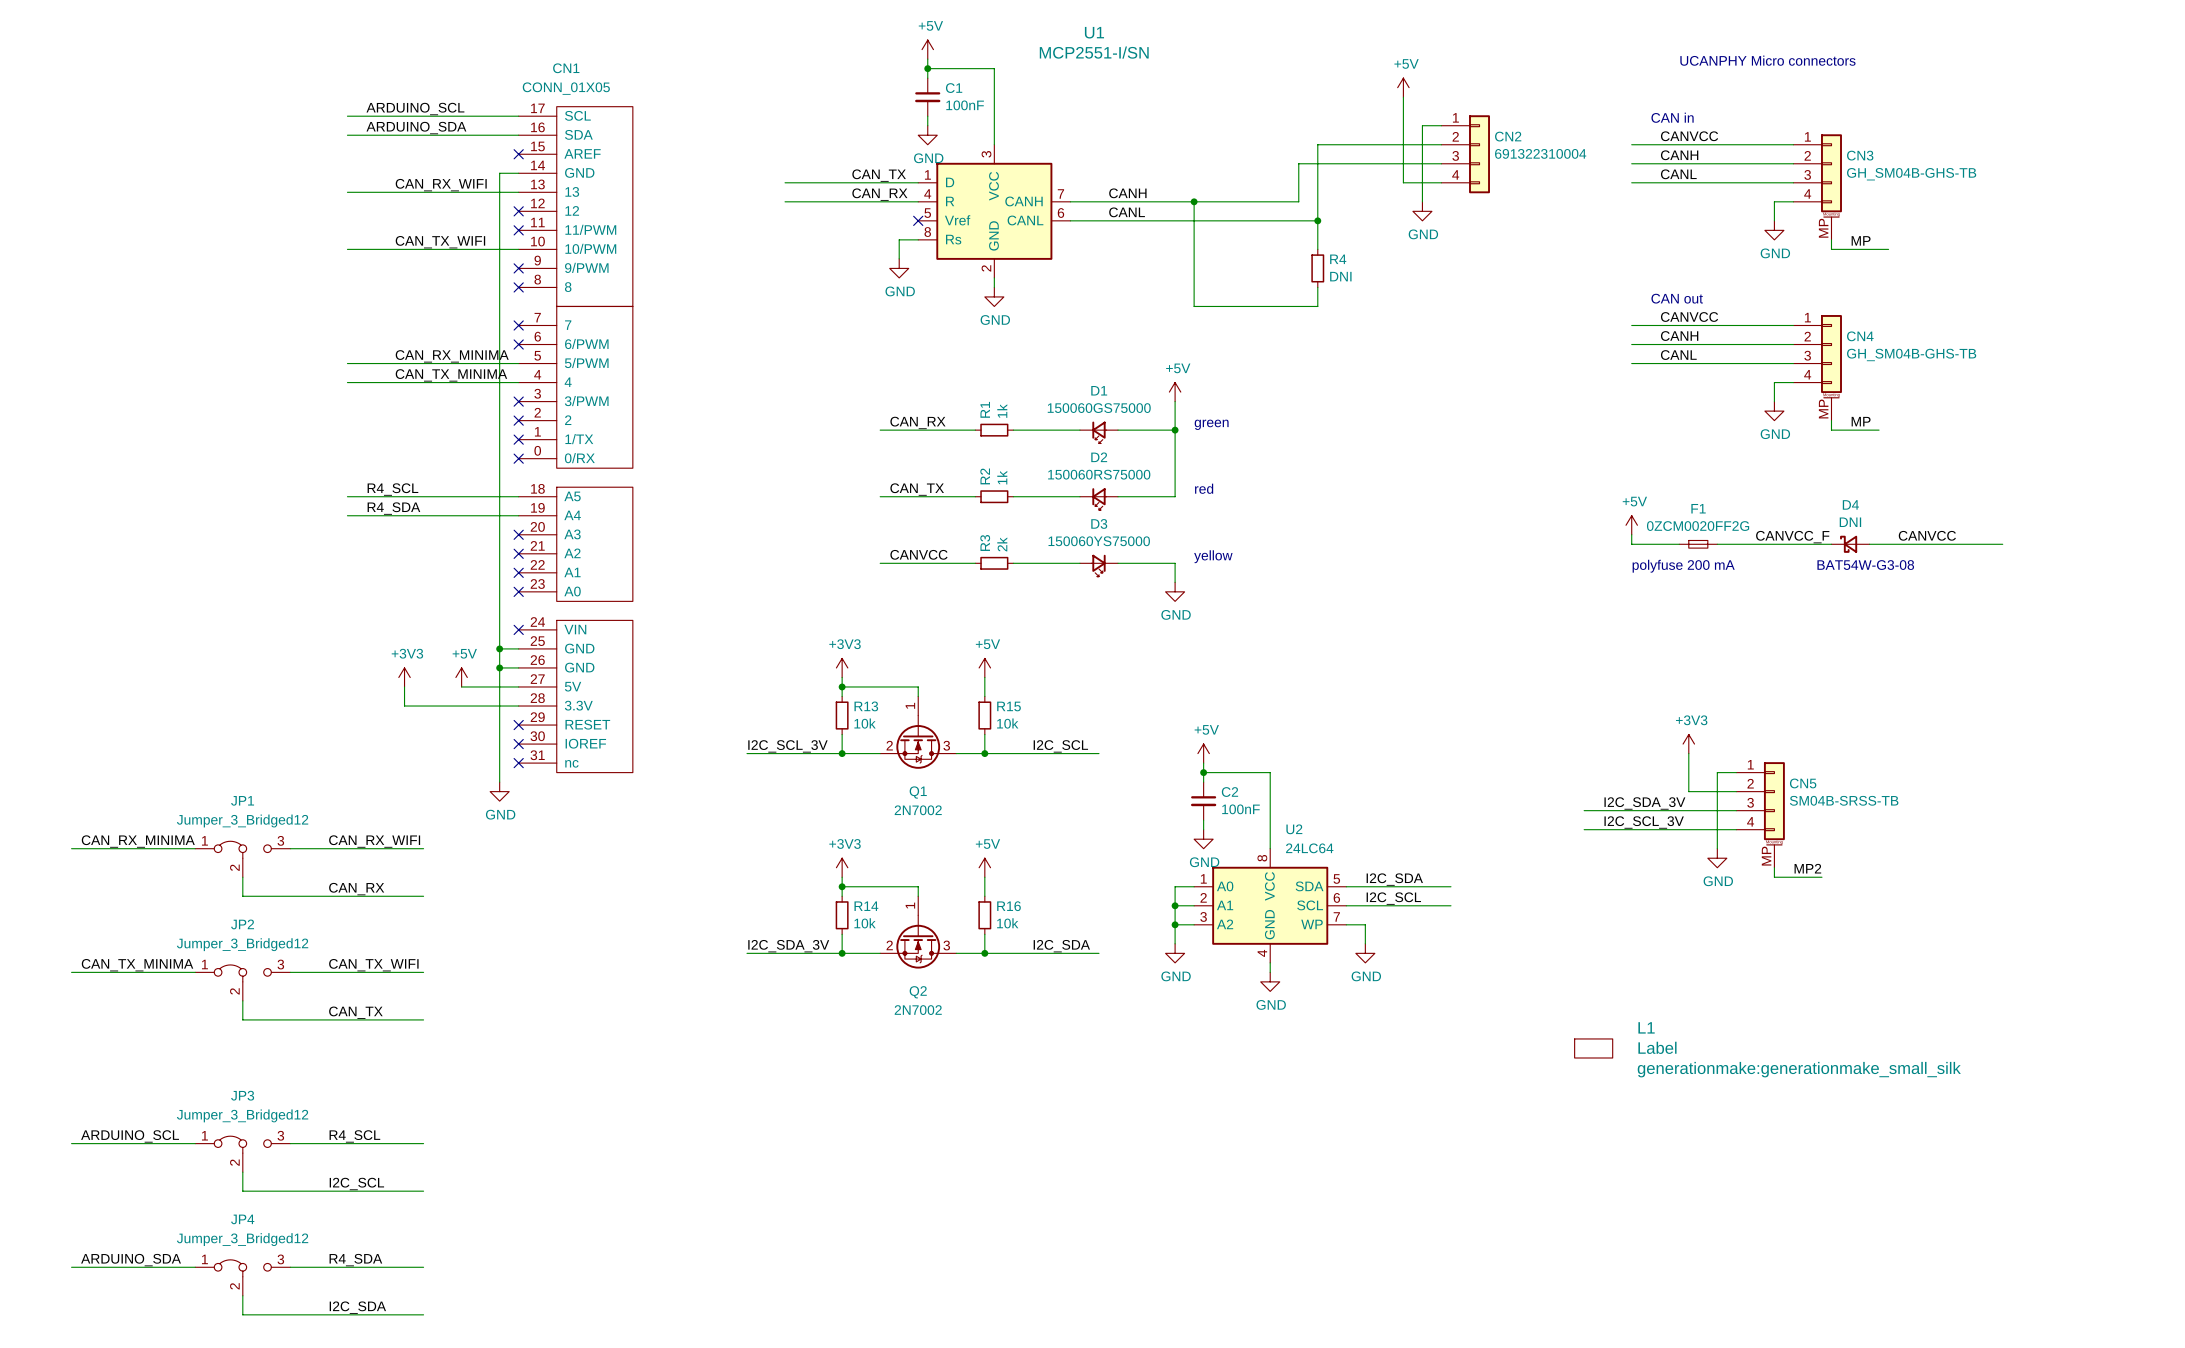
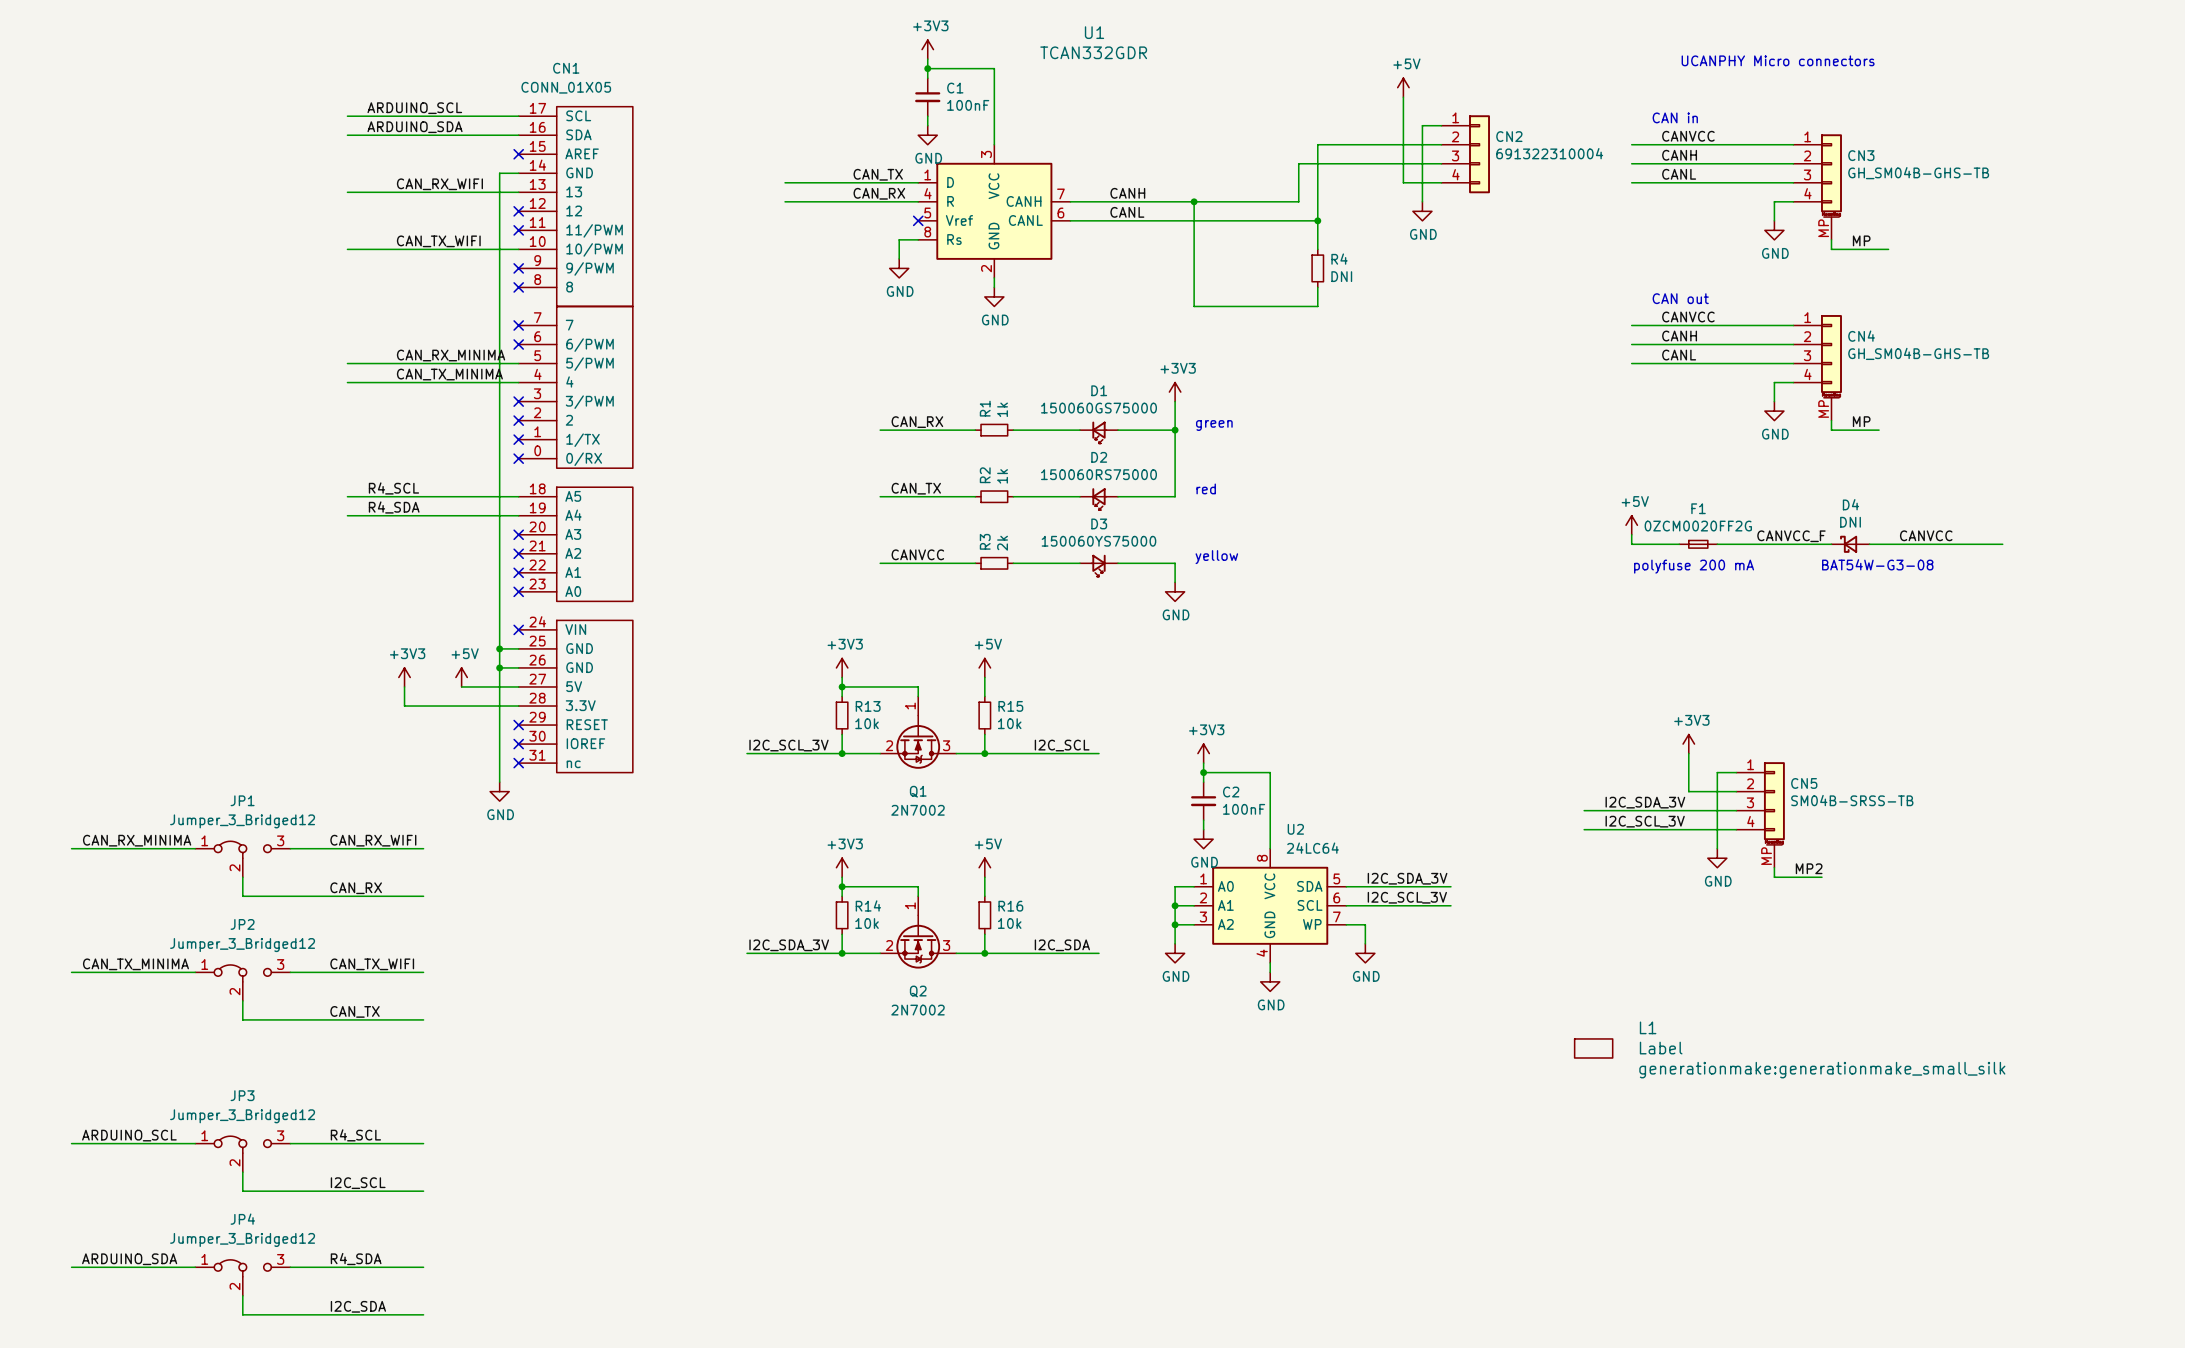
power symbol: +5V (927, 49) -> +3V3 (927, 49)
U1 value: MCP2551-I/SN (1094, 52) -> TCAN332GDR (1093, 52)
power symbol: +5V (1175, 392) -> +3V3 (1175, 392)
power symbol: +5V (1203, 753) -> +3V3 (1203, 753)
label: I2C_SDA (1394, 879) -> I2C_SDA_3V (1407, 878)
label: I2C_SCL (1393, 898) -> I2C_SCL_3V (1407, 897)

